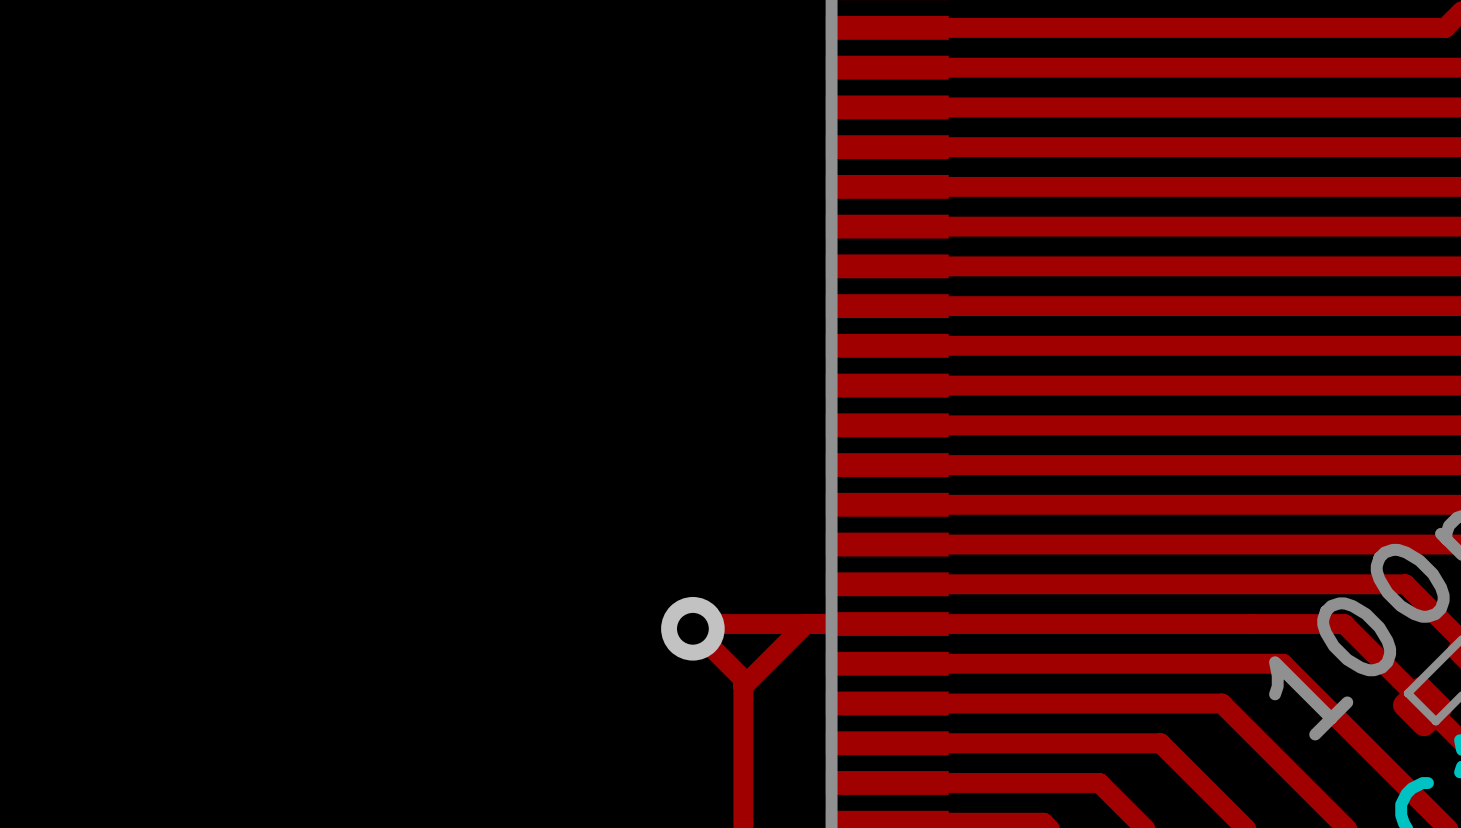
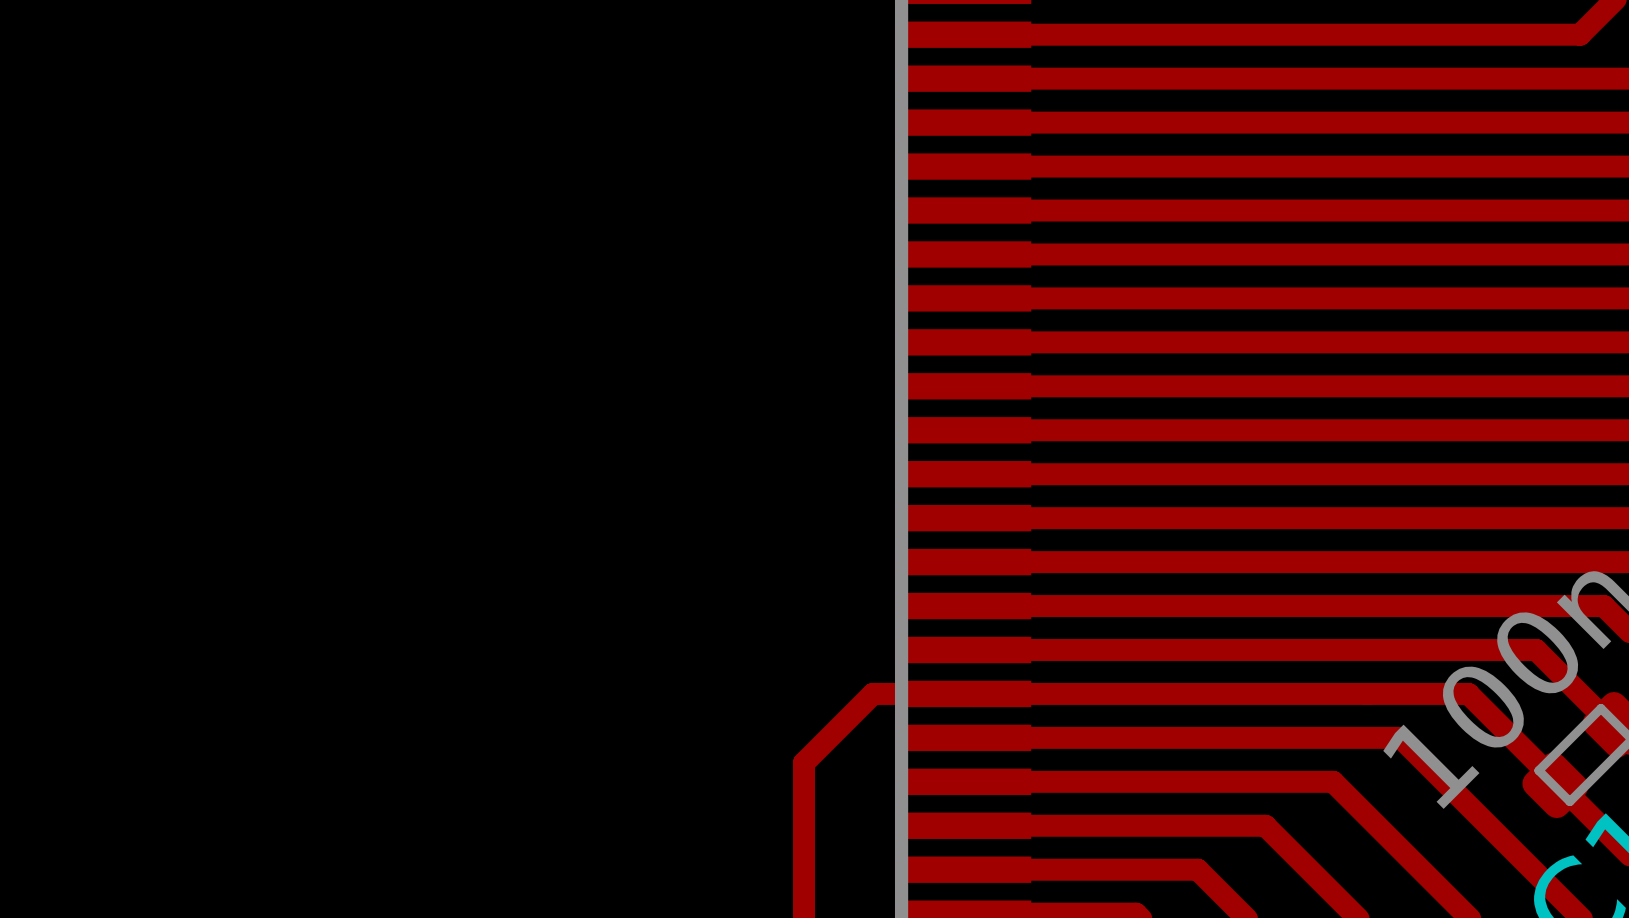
track: (805, 624) (697, 624) (692, 628) (743, 679) (743, 686) -> none
via: (692, 628) -> none

